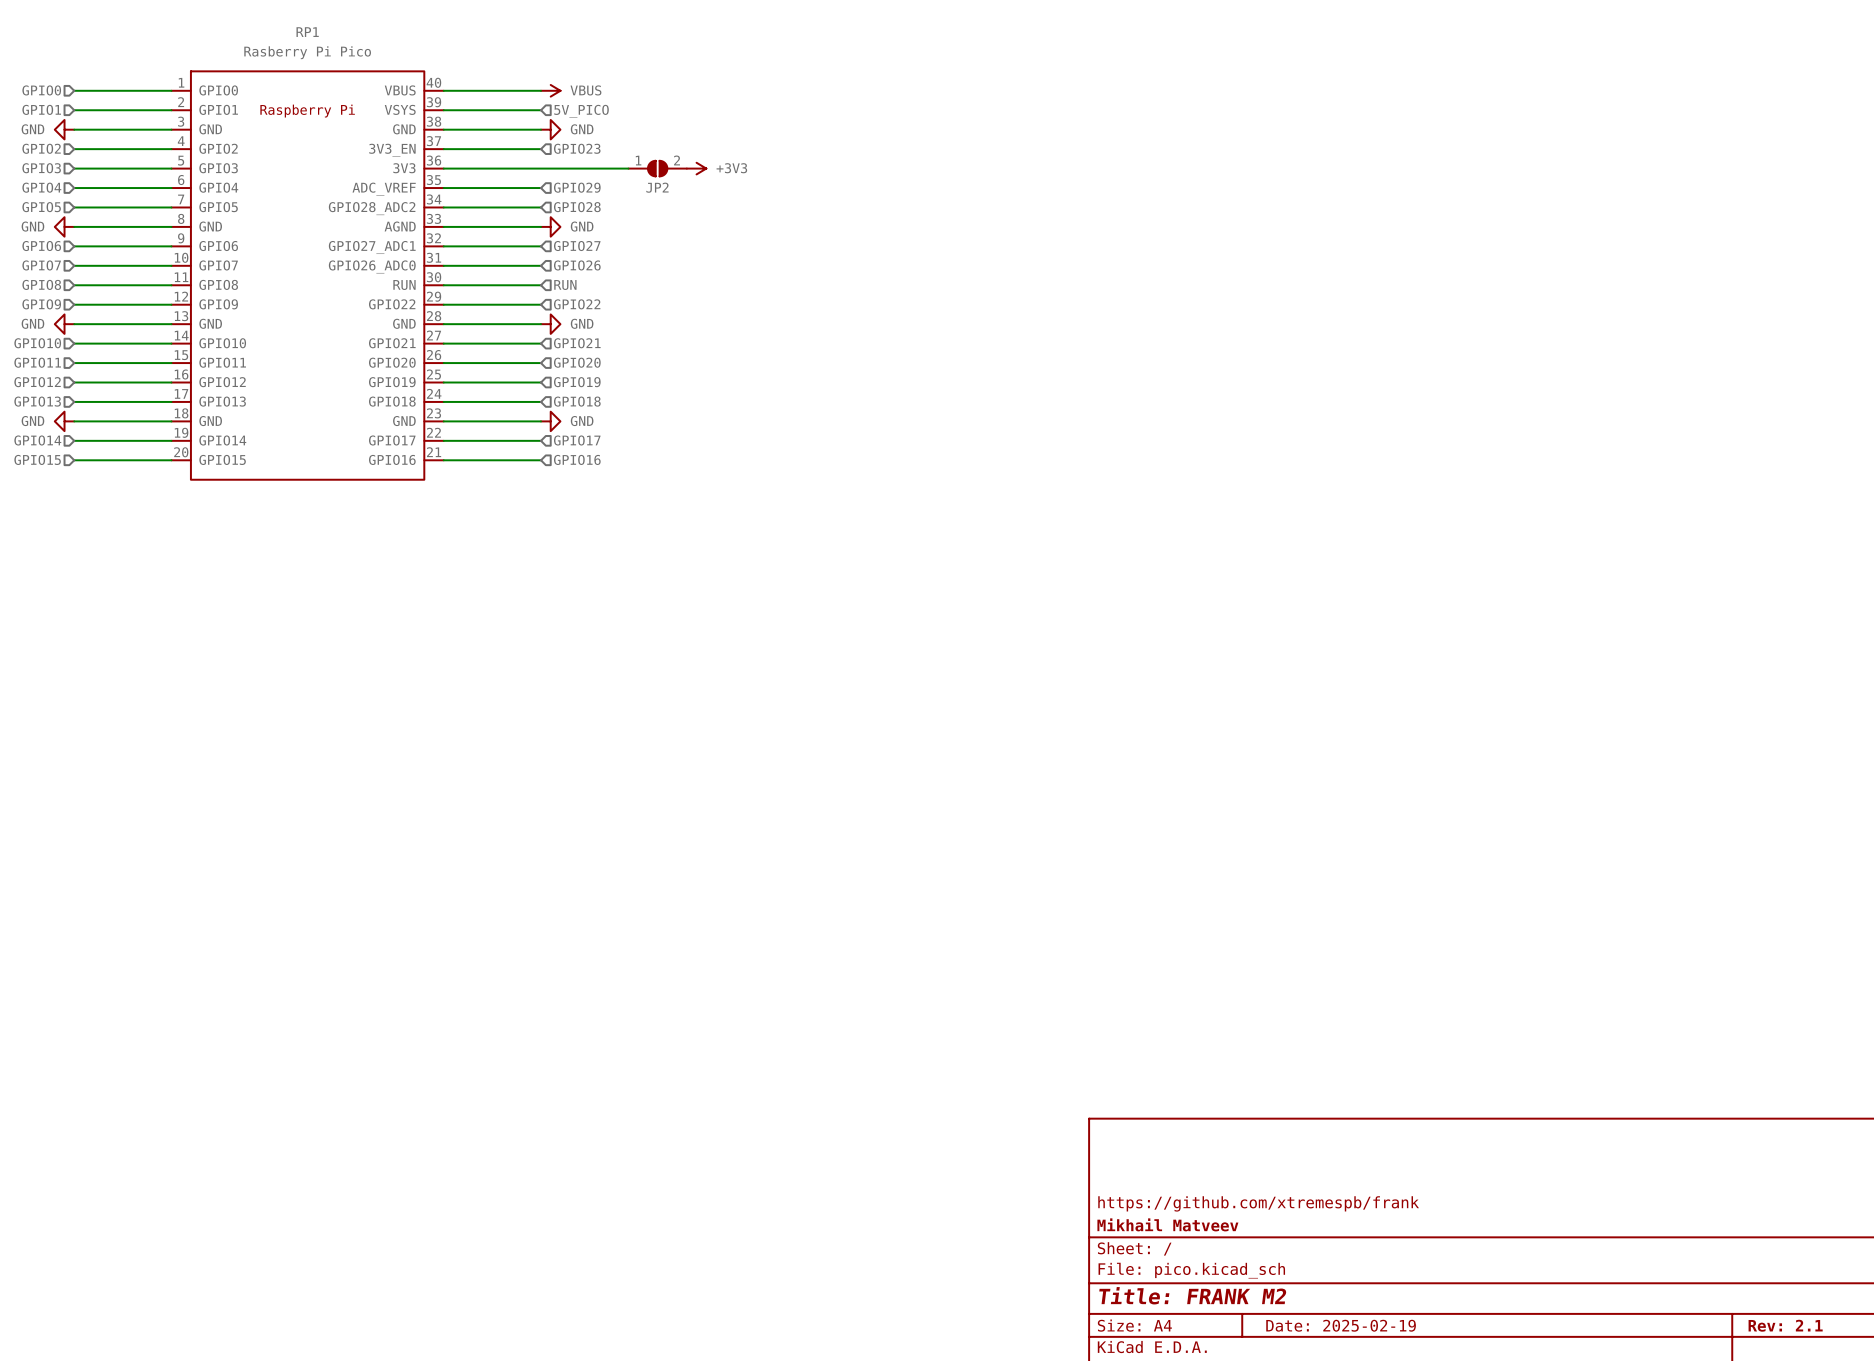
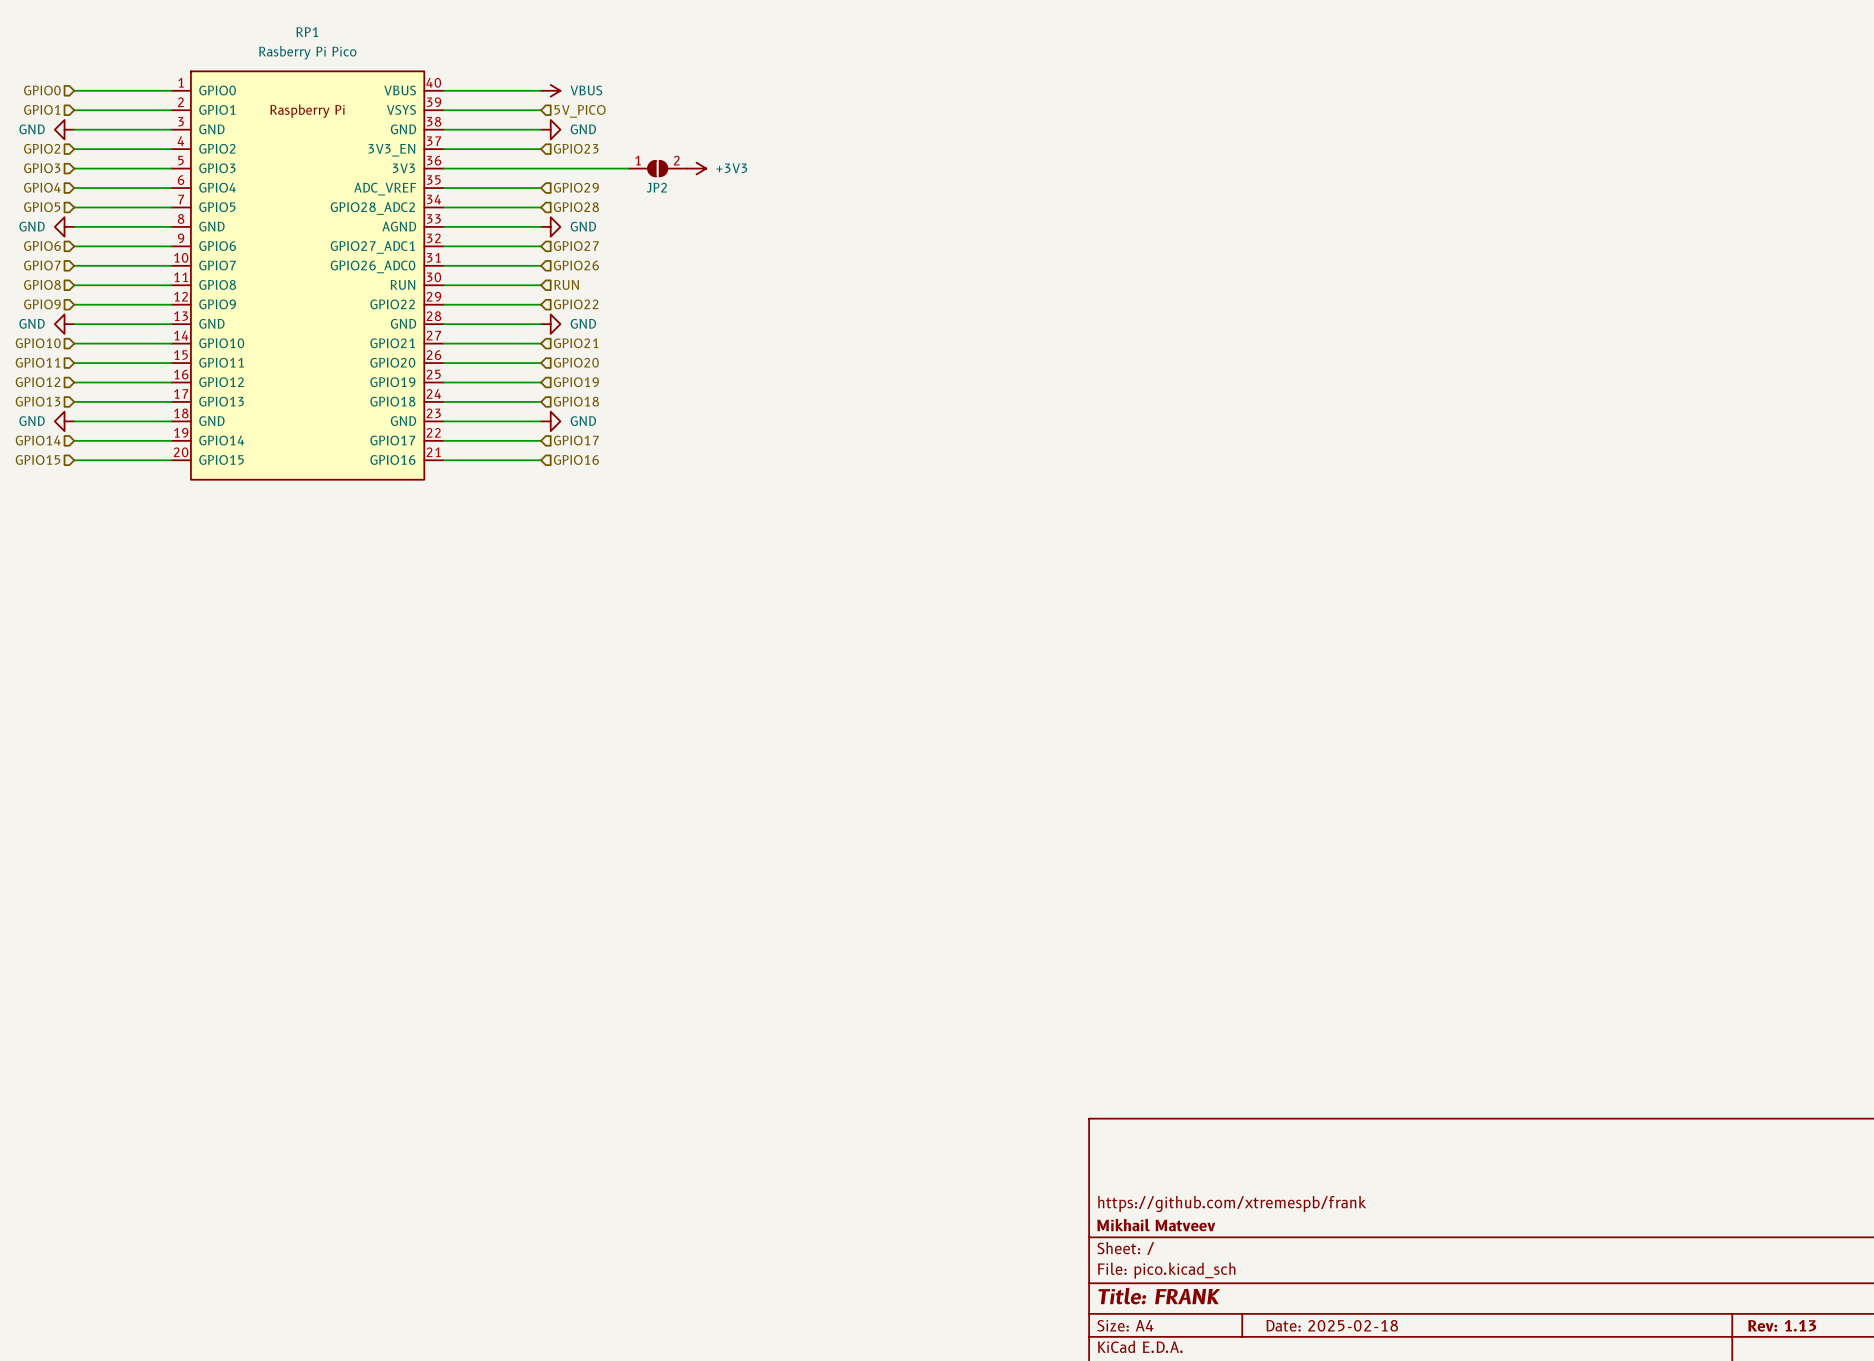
title block: Title: FRANK M2 (1192, 1295) -> Title: FRANK (1159, 1296)
title block: Date: 2025-02-19 (1341, 1325) -> Date: 2025-02-18 (1332, 1325)
title block: Rev: 2.1 (1785, 1325) -> Rev: 1.13 (1782, 1325)

